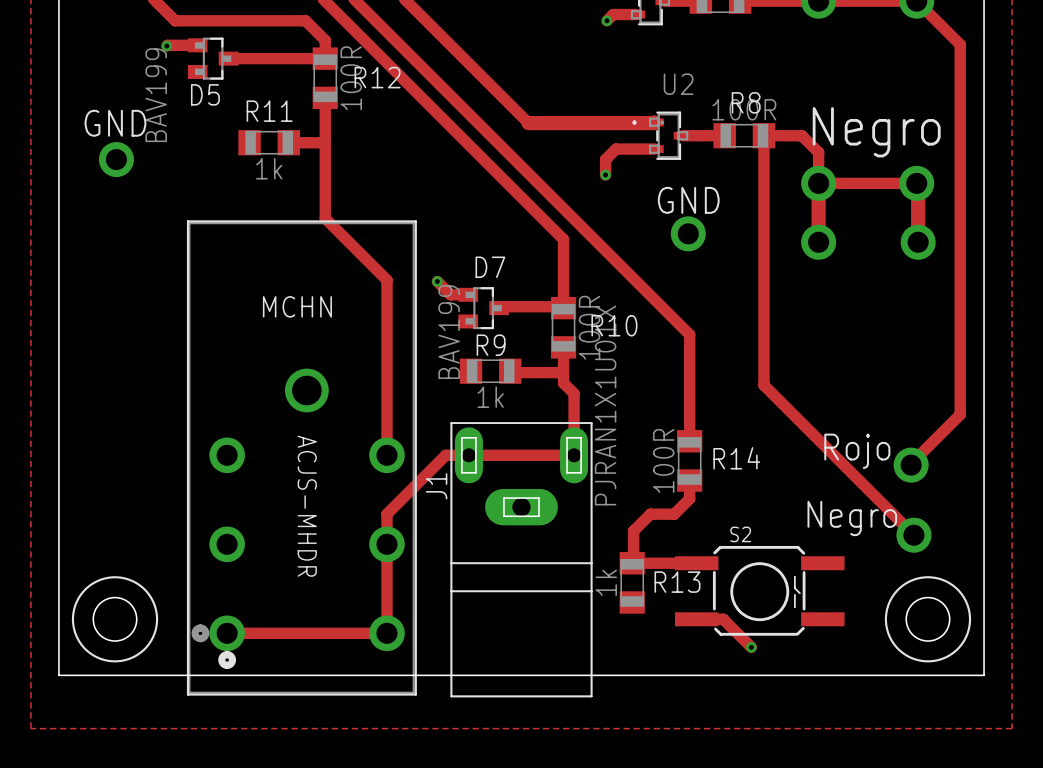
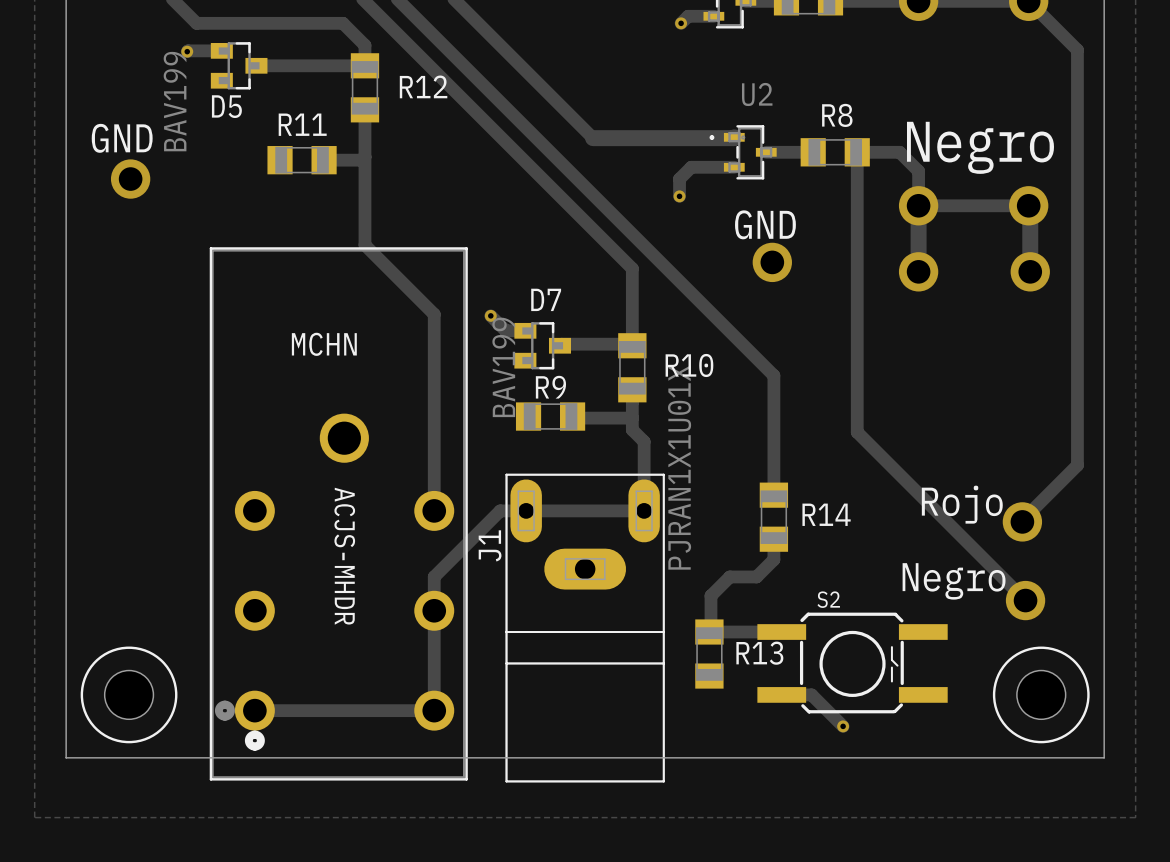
R12 value: 100R (351, 78) -> none
R8 value: 100R (744, 109) -> none
R11 value: 1k (269, 168) -> none
R10 value: 100R (589, 327) -> none
R9 value: 1k (490, 397) -> none
R14 value: 100R (663, 460) -> none
R13 value: 1k (606, 582) -> none

